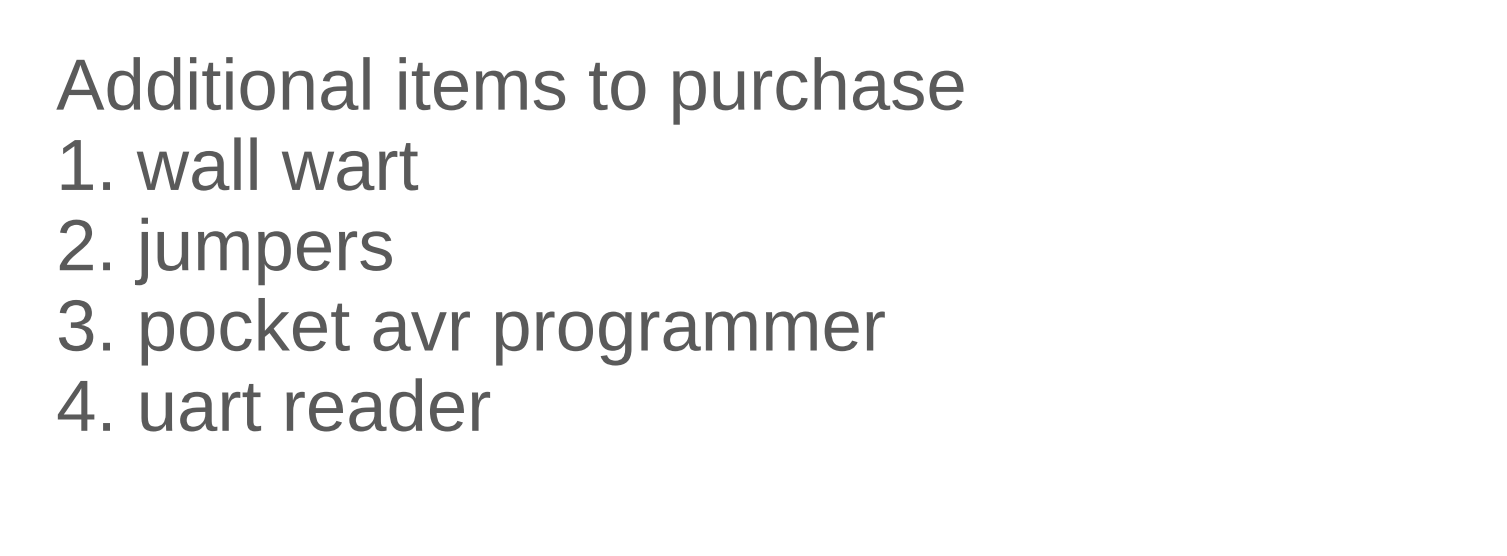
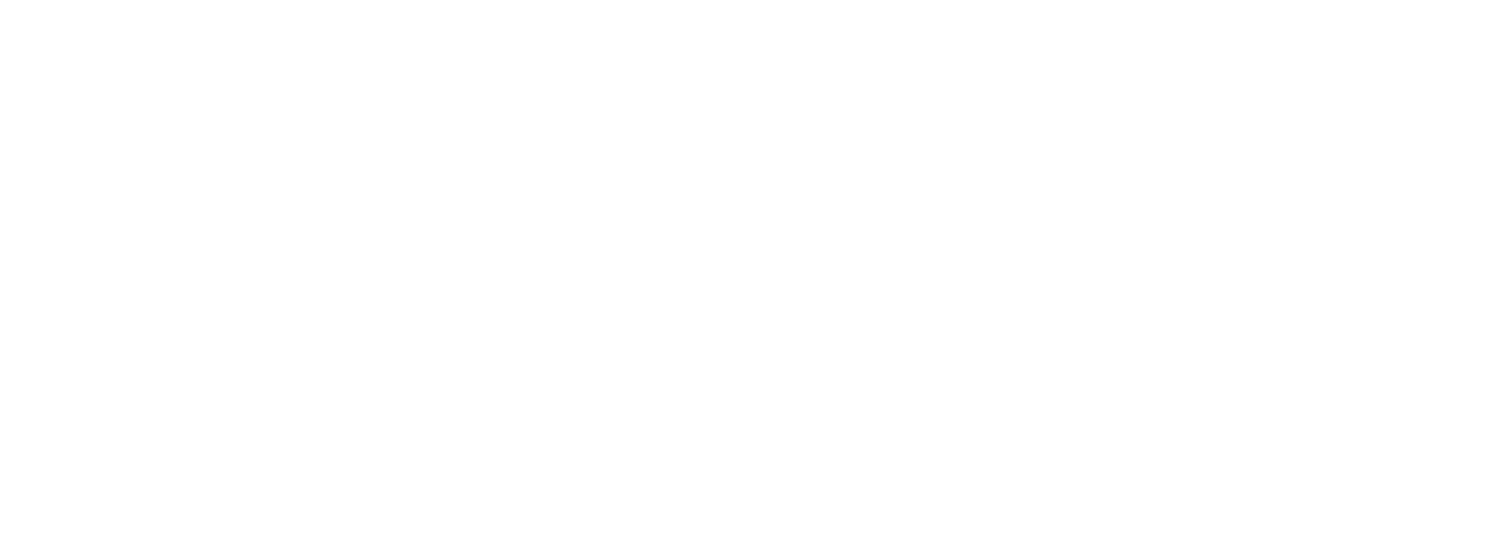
text: Additional items to purchase (509, 90) -> none
text: 1. wall wart (239, 164) -> none
text: 2. jumpers (225, 251) -> none
text: 3. pocket avr programmer (471, 331) -> none
text: 4. uart reader (273, 404) -> none

